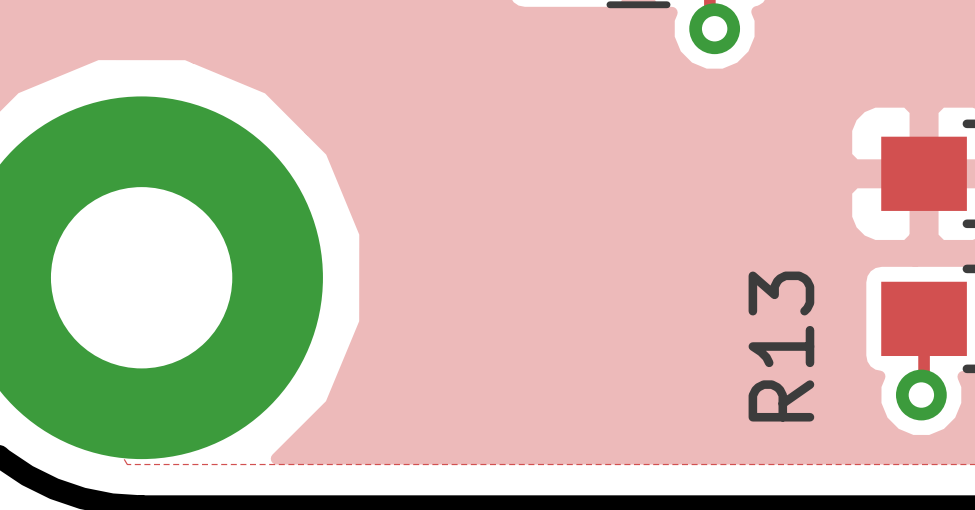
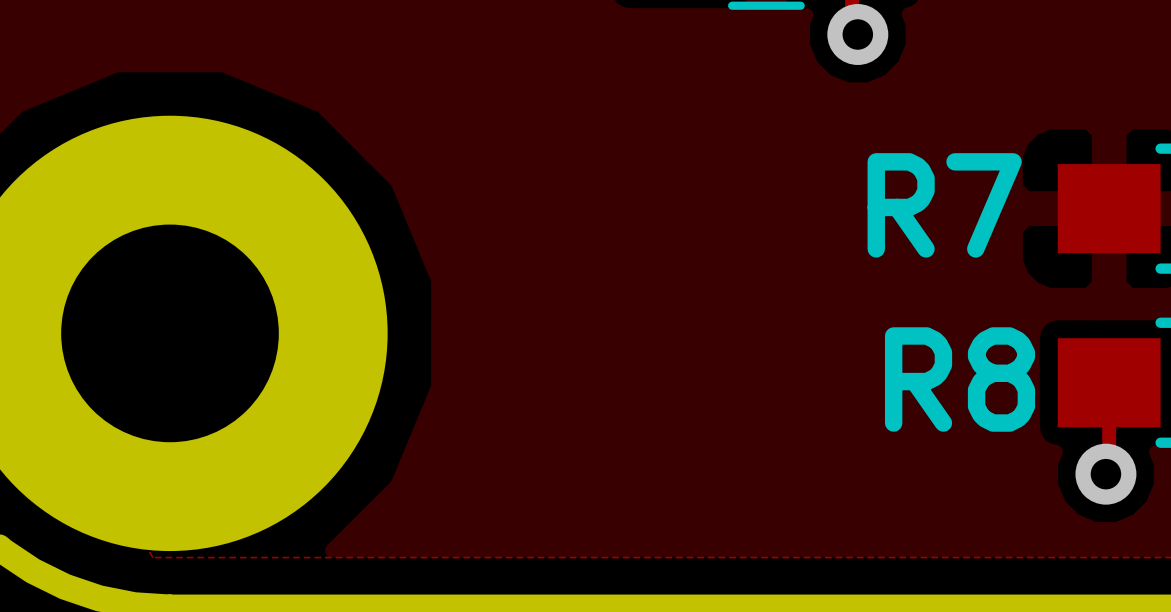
R7 name: none -> R7 (944, 205)
R13 name: R13 (781, 346) -> R8 (960, 379)

